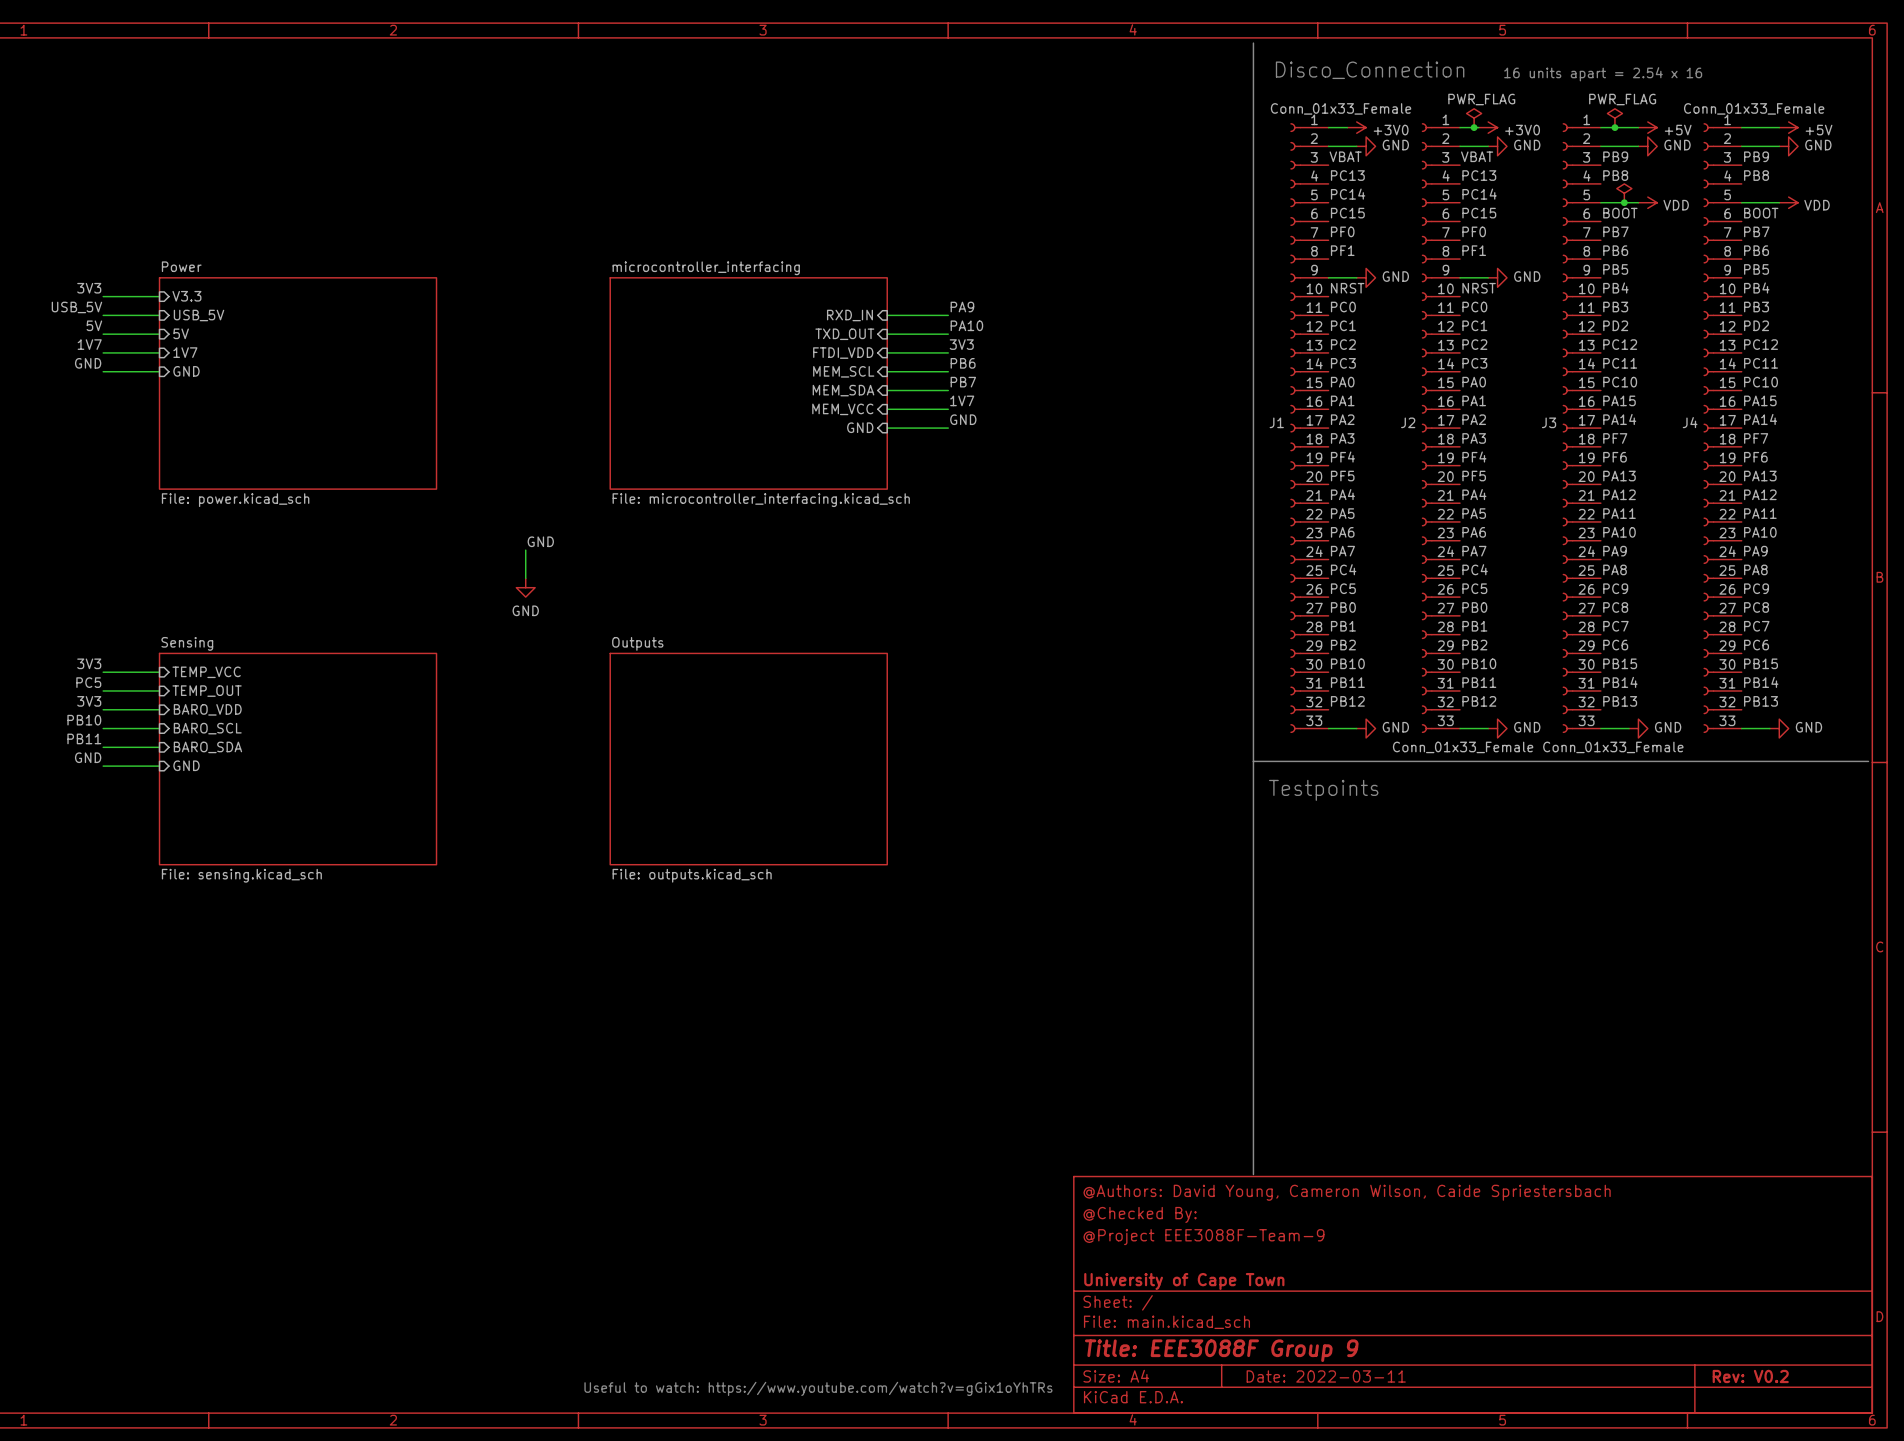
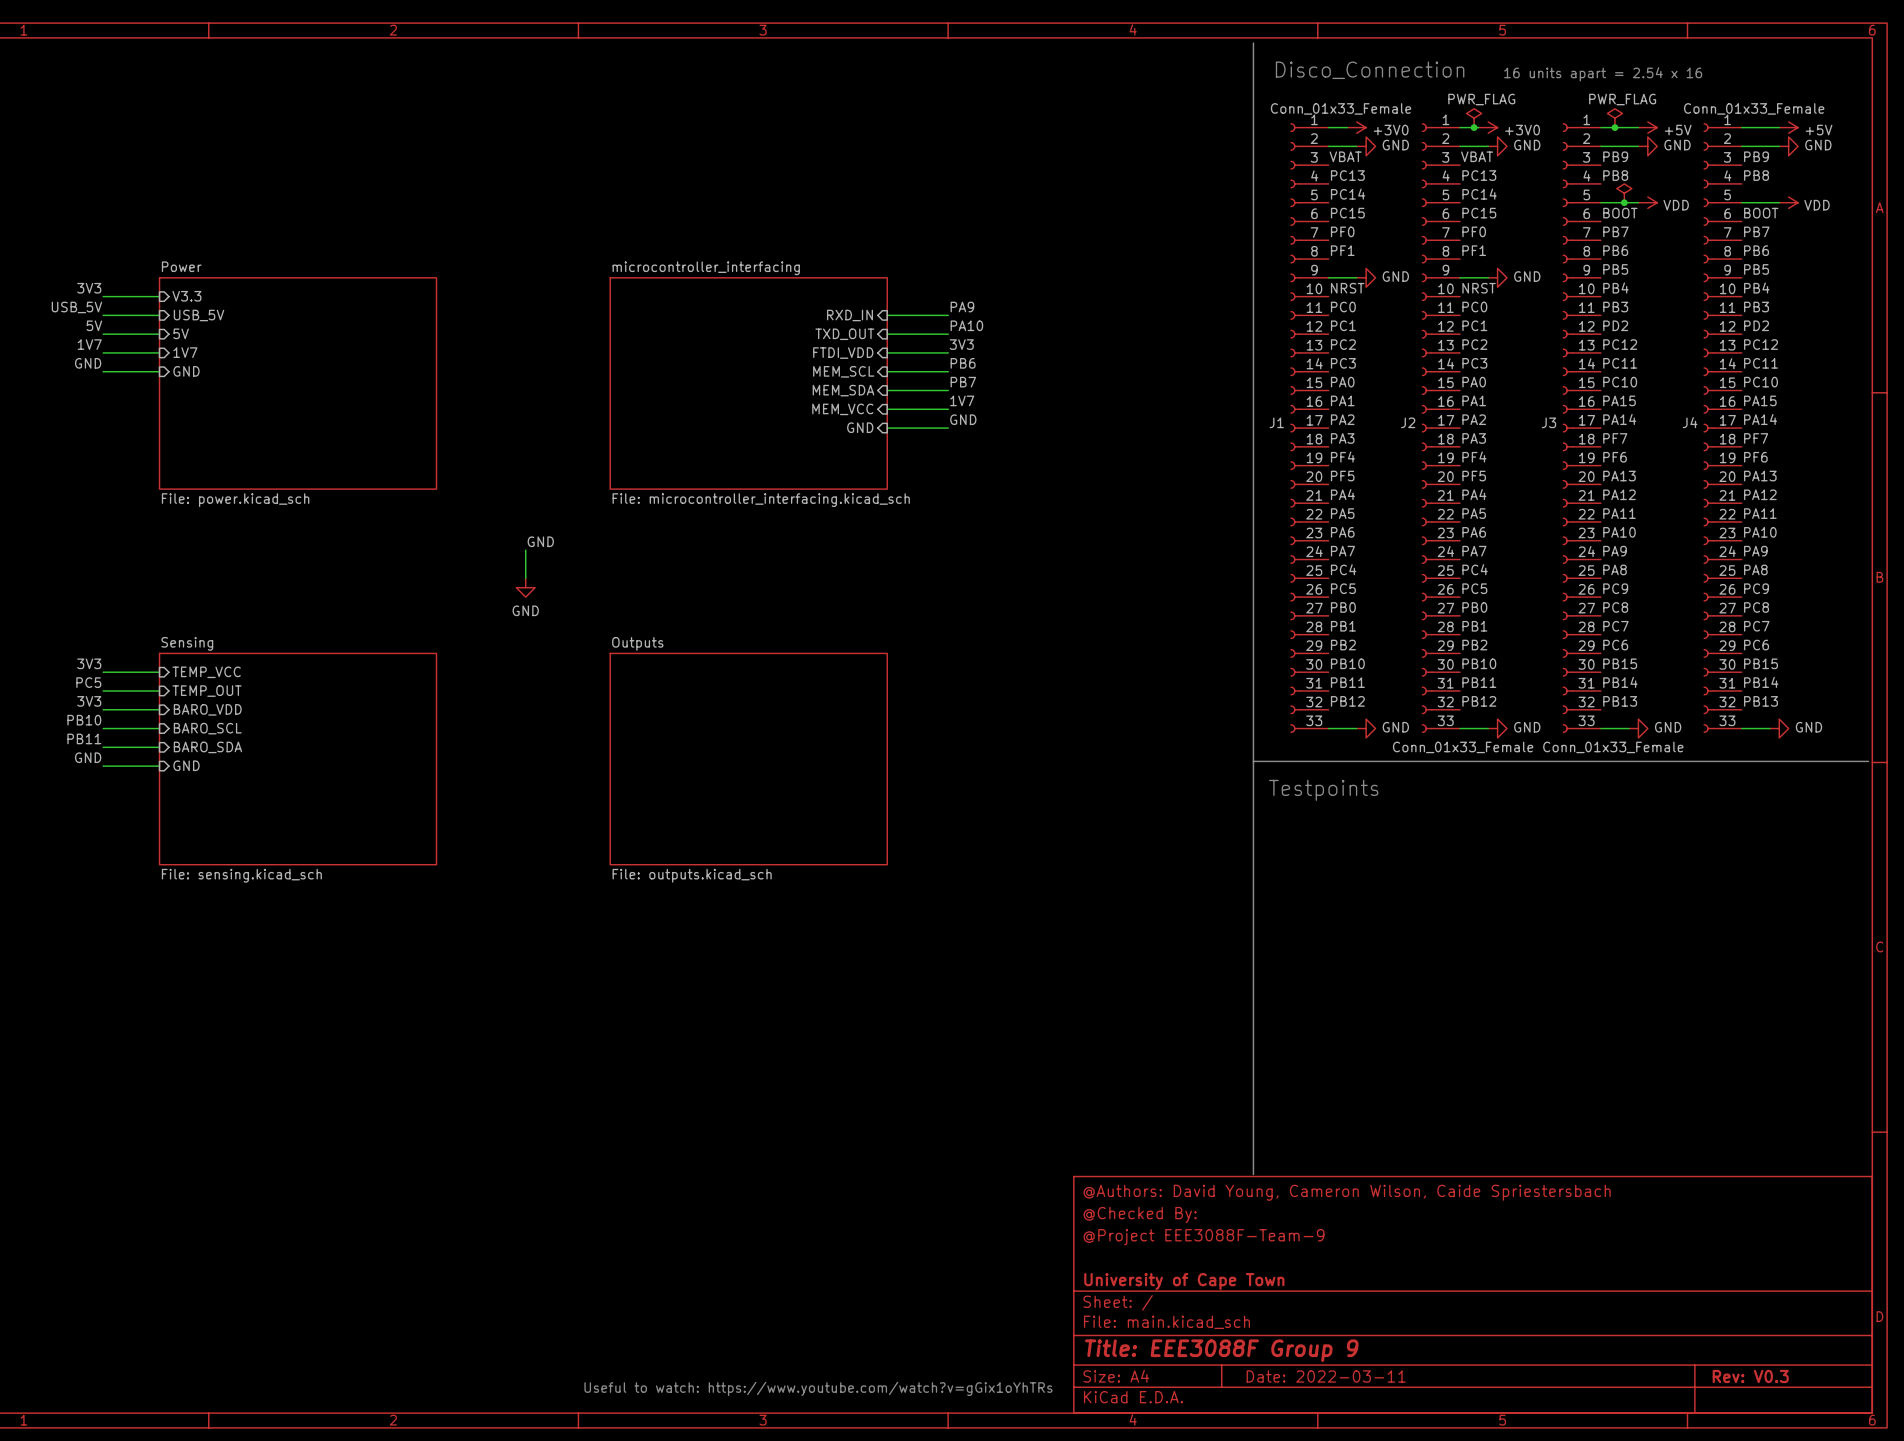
title block: Rev: V0.2 (1750, 1376) -> Rev: V0.3 (1750, 1376)

